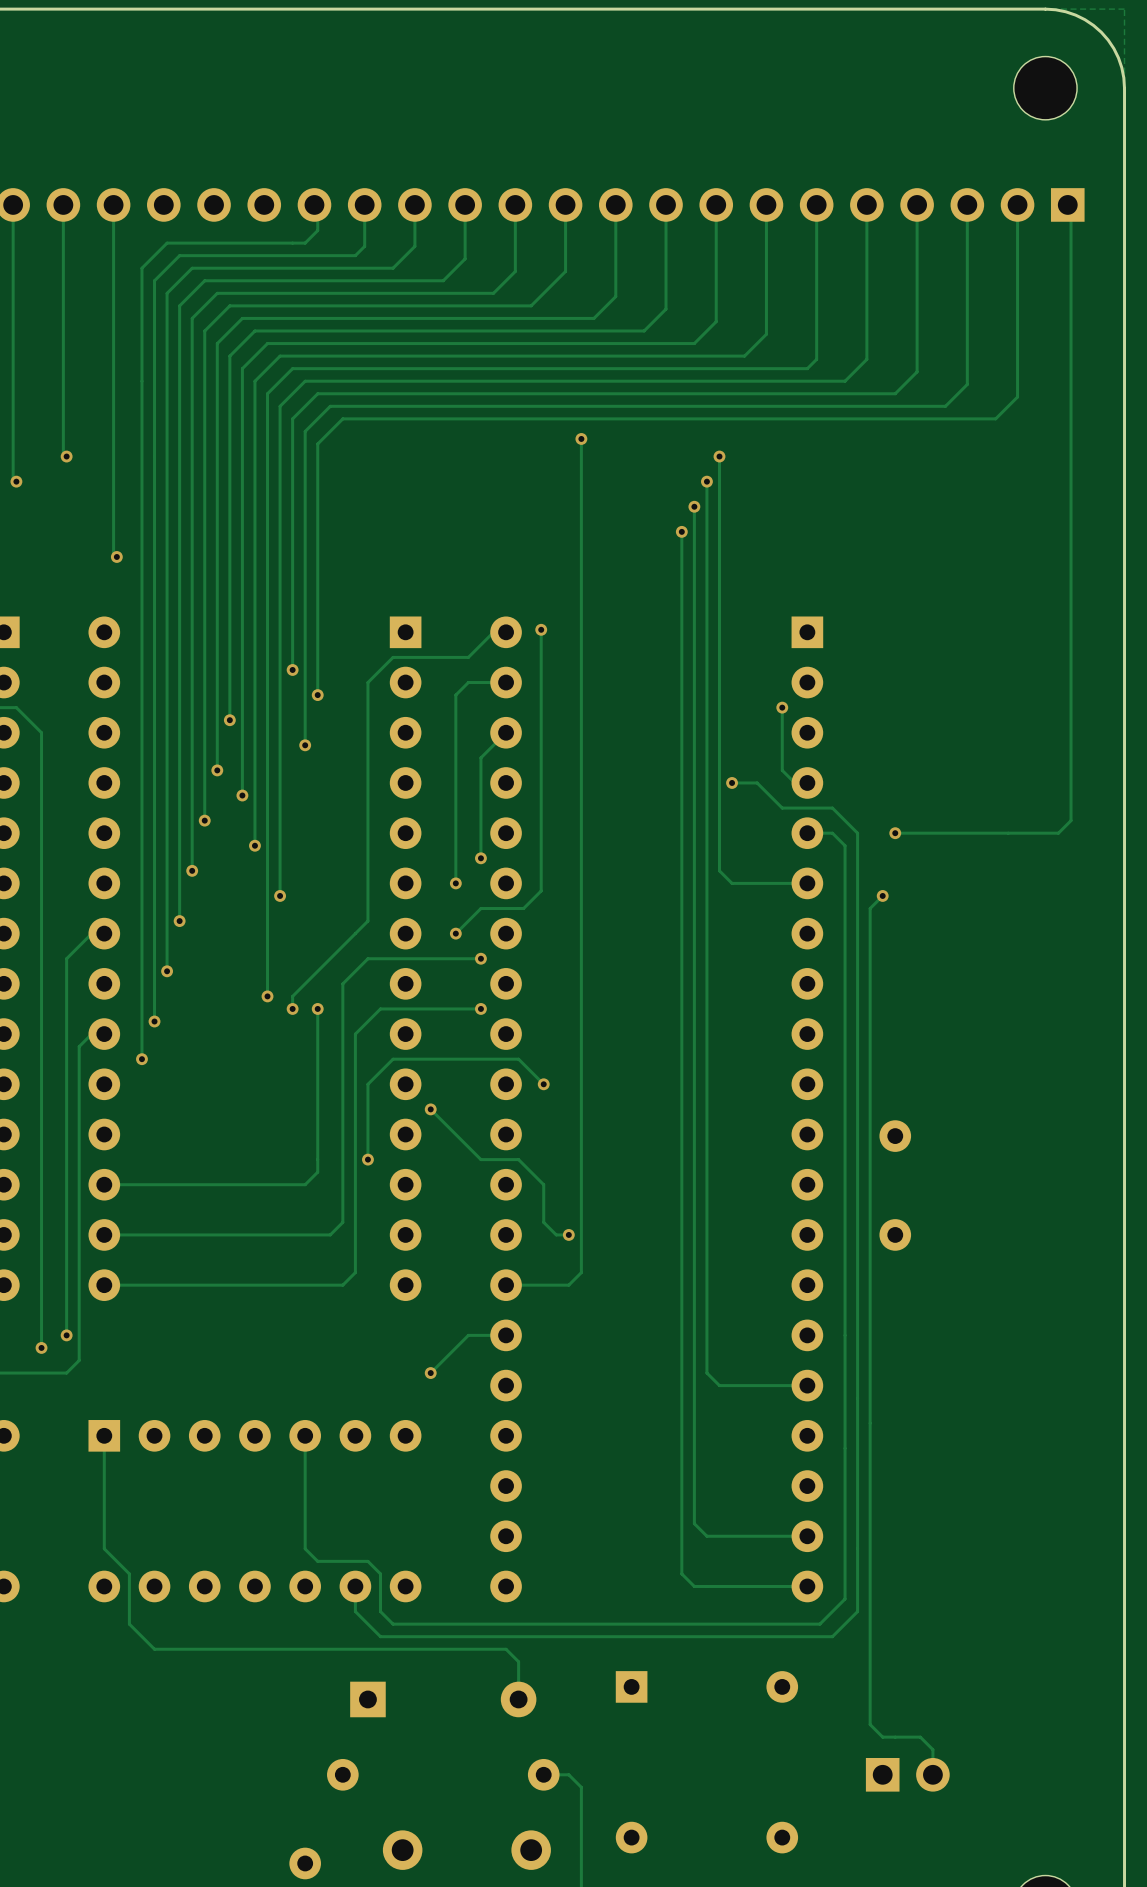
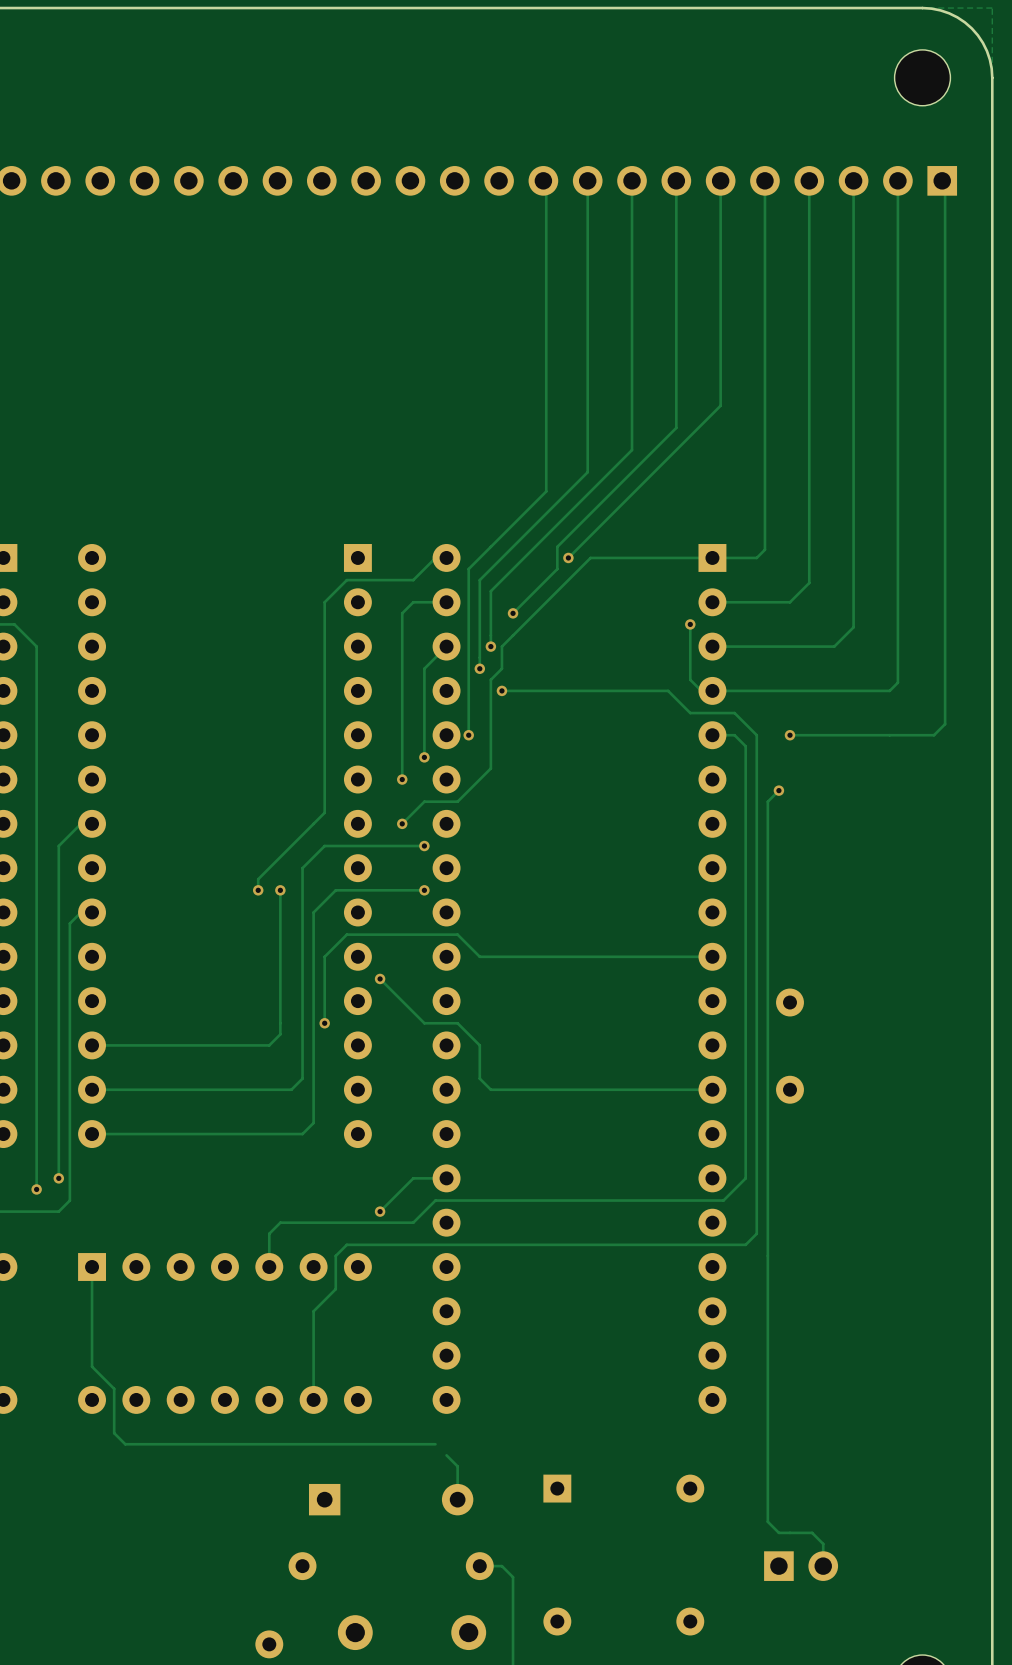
track: (13, 204) (13, 478) (16, 481) -> none
track: (63, 204) (63, 453) (66, 456) -> none
track: (113, 204) (113, 553) (116, 556) -> none
track: (314, 204) (317, 208) (317, 230) (305, 243) (167, 243) (141, 268) (141, 1059) -> none
track: (364, 204) (364, 246) (355, 255) (179, 255) (154, 280) (154, 1021) -> none
track: (414, 204) (414, 246) (393, 268) (192, 268) (167, 293) (167, 971) -> none
track: (465, 204) (465, 258) (443, 280) (204, 280) (179, 305) (179, 921) -> none
track: (515, 204) (515, 271) (493, 293) (217, 293) (192, 318) (192, 870) -> none
track: (565, 204) (565, 271) (531, 305) (229, 305) (204, 330) (204, 820) -> none
track: (615, 204) (615, 296) (593, 318) (242, 318) (217, 343) (217, 770) -> none
track: none -> (546, 183) (546, 491) (468, 569) (468, 735)
track: (666, 309) (644, 330) (254, 330) (229, 356) (229, 720) -> (587, 272) (587, 472) (479, 580) (479, 668)
track: (716, 321) (694, 343) (267, 343) (242, 368) (242, 795) -> (632, 283) (632, 450) (490, 591) (490, 646)
track: (766, 334) (744, 356) (280, 356) (254, 381) (254, 845) -> (676, 294) (676, 427) (557, 546) (557, 569) (513, 613)
track: (816, 359) (807, 368) (292, 368) (267, 393) (267, 996) -> (720, 317) (720, 405) (568, 557)
track: (866, 359) (845, 381) (305, 381) (280, 406) (280, 895) -> (764, 317) (764, 549) (756, 557) (590, 557) (501, 646) (501, 668) (490, 679) (490, 768) (457, 801)
track: (917, 371) (895, 393) (317, 393) (292, 418) (292, 669) -> (809, 328) (809, 582) (790, 602) (712, 602)
track: (967, 384) (945, 406) (330, 406) (305, 431) (305, 745) -> (853, 339) (853, 627) (834, 646) (712, 646)
track: (1017, 397) (995, 418) (342, 418) (317, 443) (317, 695) -> (897, 350) (897, 682) (889, 690) (712, 690)
track: (581, 438) (581, 1272) (568, 1285) (506, 1285) -> none
via: (581, 438) -> none
via: (66, 456) -> none
track: (719, 456) (719, 870) (732, 883) (807, 883) -> none
via: (719, 456) -> none
via: (16, 481) -> none
track: (706, 481) (706, 1373) (719, 1385) (807, 1385) -> none
via: (706, 481) -> none
track: (694, 506) (694, 1523) (706, 1536) (807, 1536) -> none
via: (694, 506) -> none
track: (681, 531) (681, 1573) (694, 1586) (807, 1586) -> none
via: (681, 531) -> none
via: (116, 556) -> none
track: (541, 629) (541, 890) (523, 908) (518, 908) -> none
via: (541, 629) -> none
via: none -> (568, 557)
via: (292, 669) -> none
via: (317, 695) -> none
via: none -> (513, 613)
via: (229, 720) -> none
via: none -> (490, 646)
via: (305, 745) -> none
via: none -> (479, 668)
via: (217, 770) -> none
via: none -> (501, 690)
track: none -> (645, 690) (501, 690)
via: (732, 782) -> none
via: (242, 795) -> none
via: (204, 820) -> none
via: none -> (468, 735)
via: (254, 845) -> none
via: (192, 870) -> none
via: (280, 895) -> none
via: (179, 921) -> none
via: (167, 971) -> none
via: (267, 996) -> none
via: (154, 1021) -> none
via: (141, 1059) -> none
via: (543, 1084) -> none
track: none -> (712, 956) (479, 956)
via: (568, 1234) -> none
track: none -> (712, 1089) (501, 1089)
track: (845, 1335) (845, 1599) (819, 1624) (393, 1624) (380, 1611) (380, 1573) (367, 1561) (317, 1561) (305, 1548) (305, 1435) -> (745, 1178) (723, 1200) (435, 1200) (413, 1222) (280, 1222) (269, 1233) (269, 1267)
track: (857, 1398) (857, 1611) (832, 1636) (493, 1636) -> (756, 1233) (745, 1244) (346, 1244) (335, 1255) (335, 1289) (313, 1311) (313, 1388)
track: (355, 1586) (355, 1611) (380, 1636) -> none
track: (141, 1636) (154, 1649) (506, 1649) -> (125, 1444) (335, 1444)

